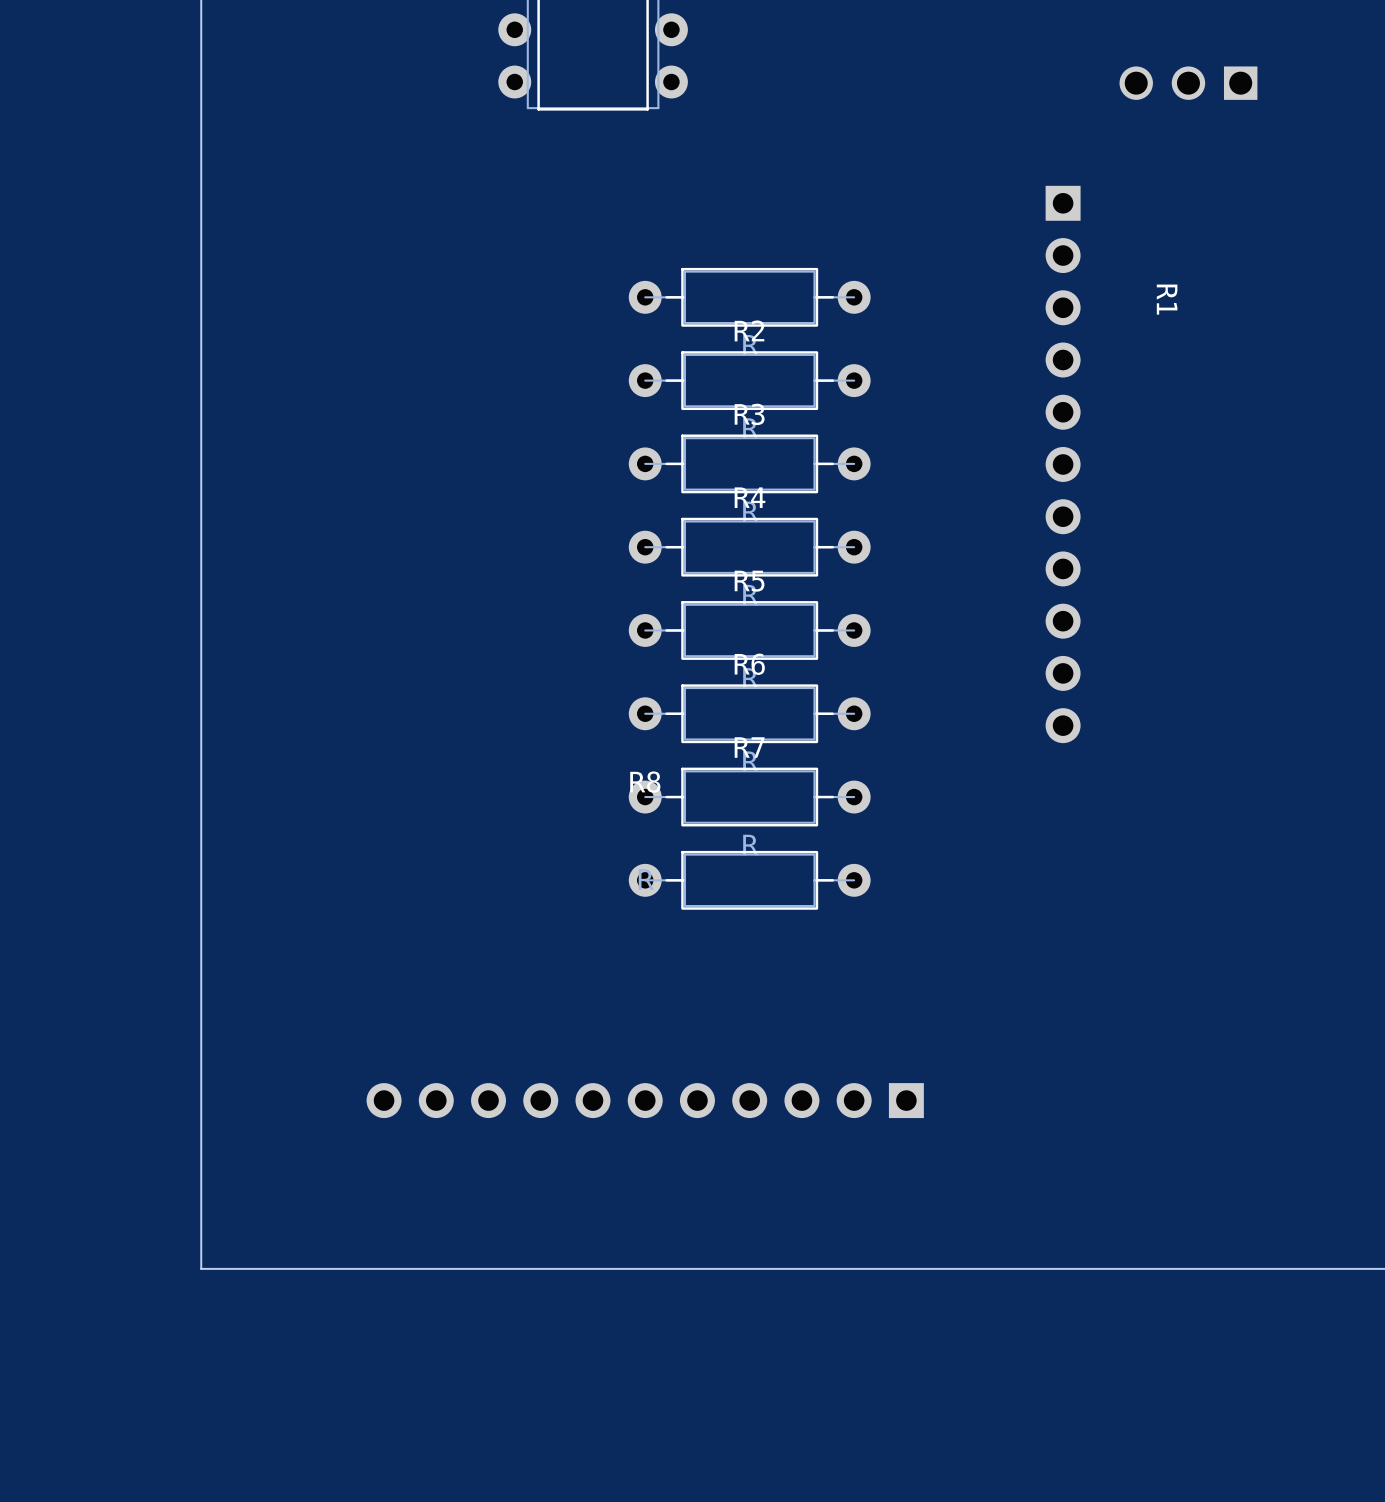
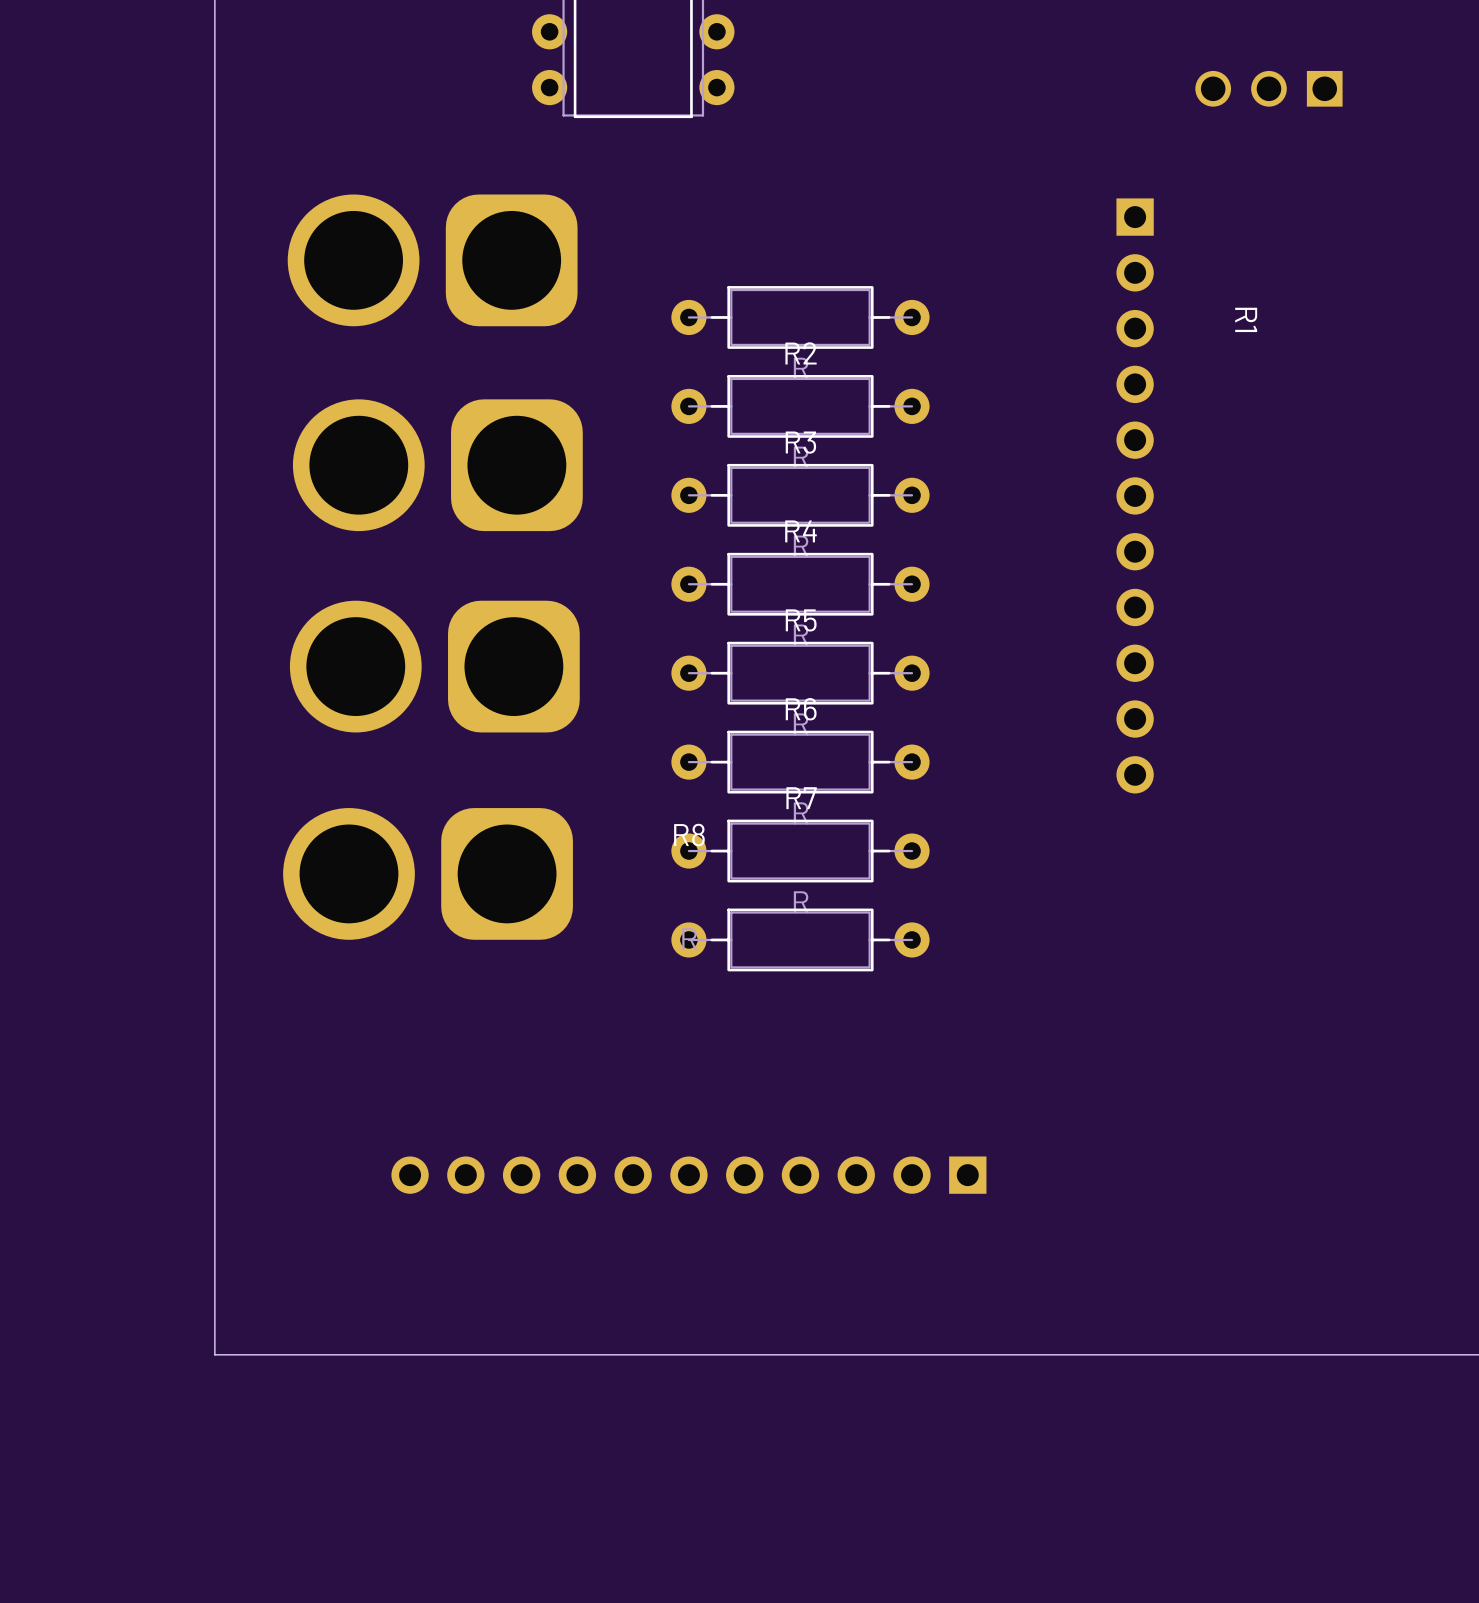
part: none -> (432, 260)
part: none -> (437, 465)
part: none -> (434, 666)
part: none -> (428, 873)

